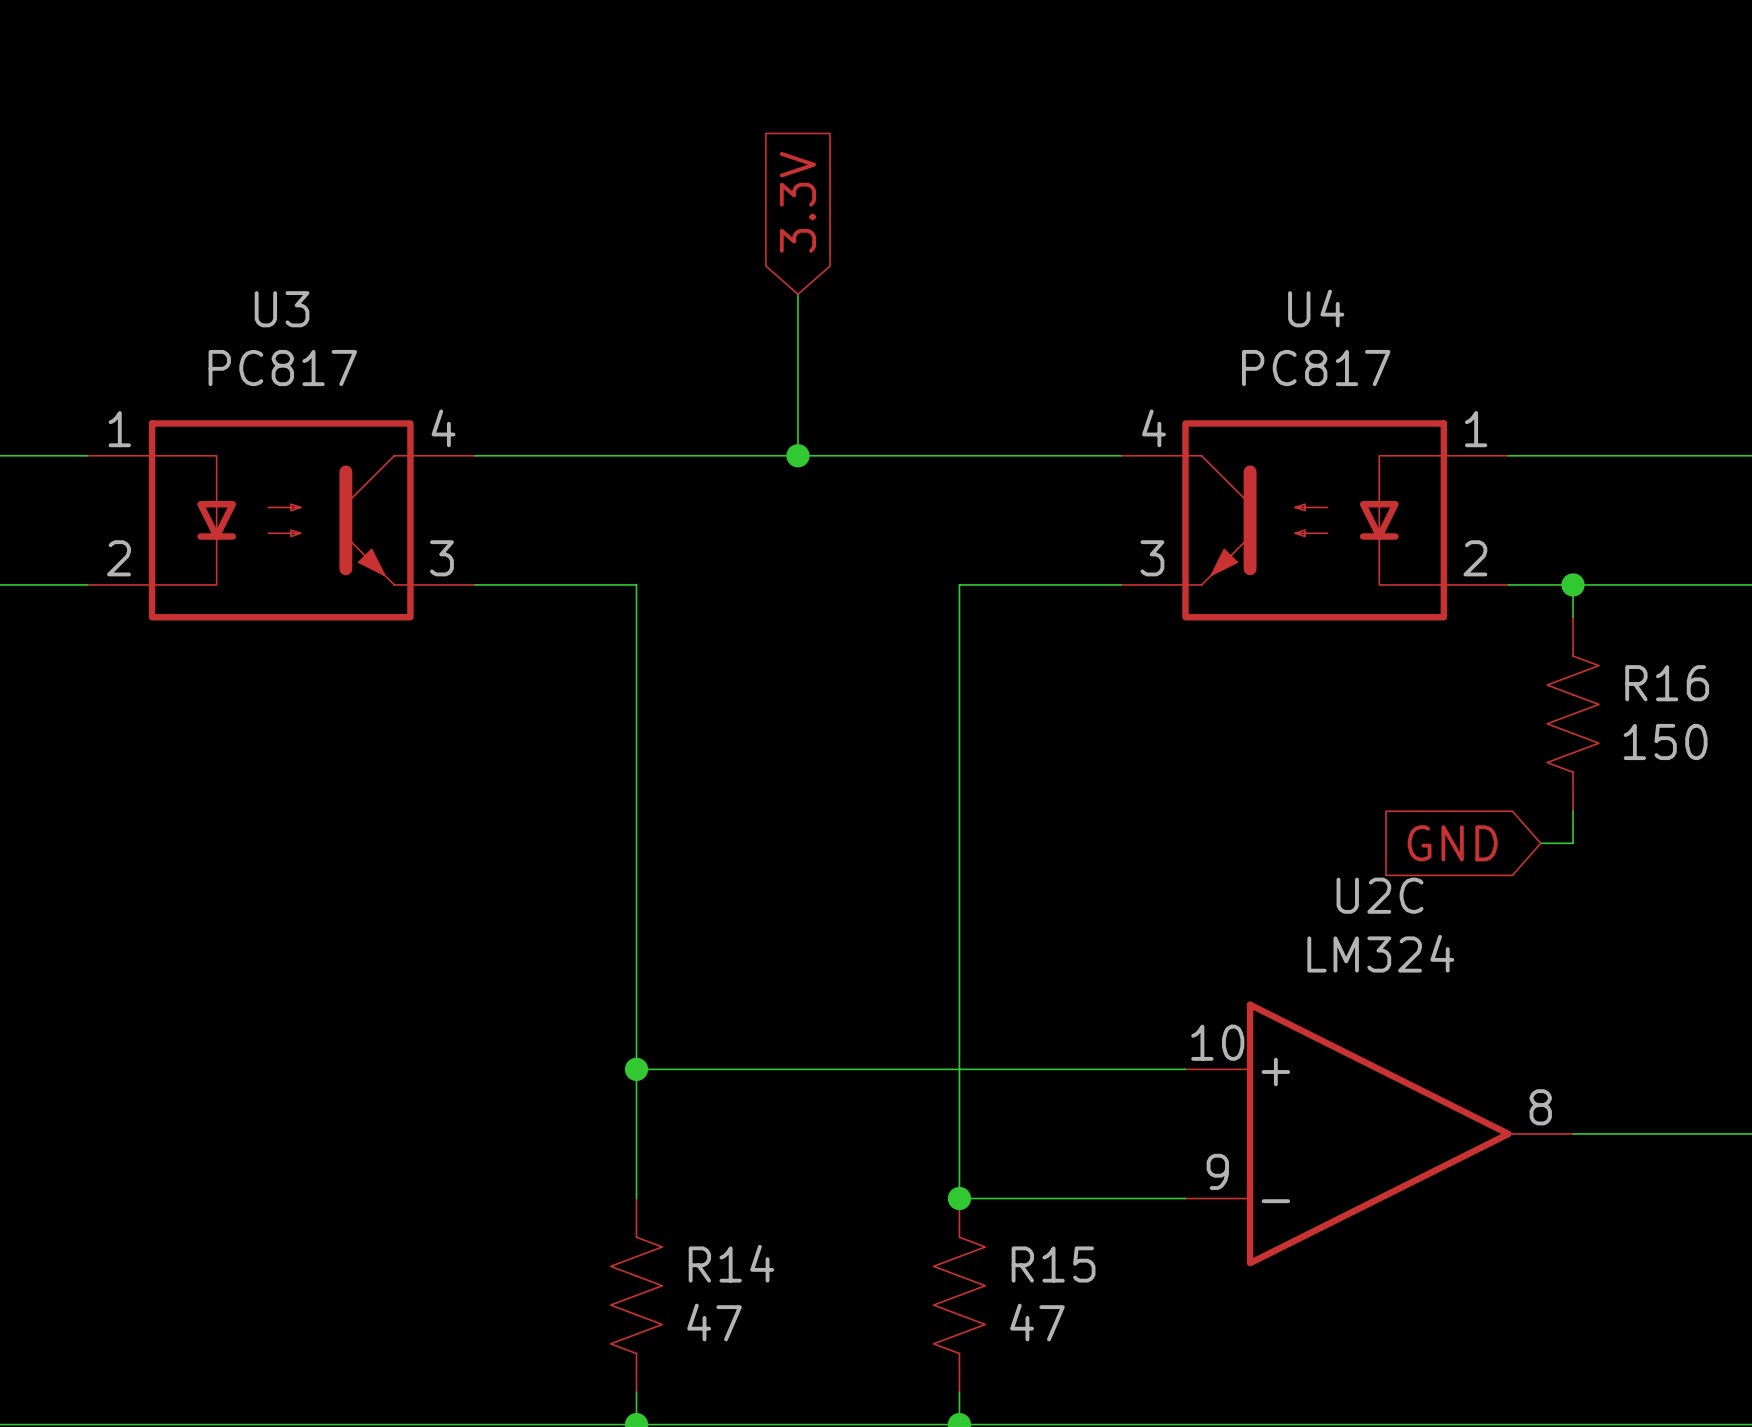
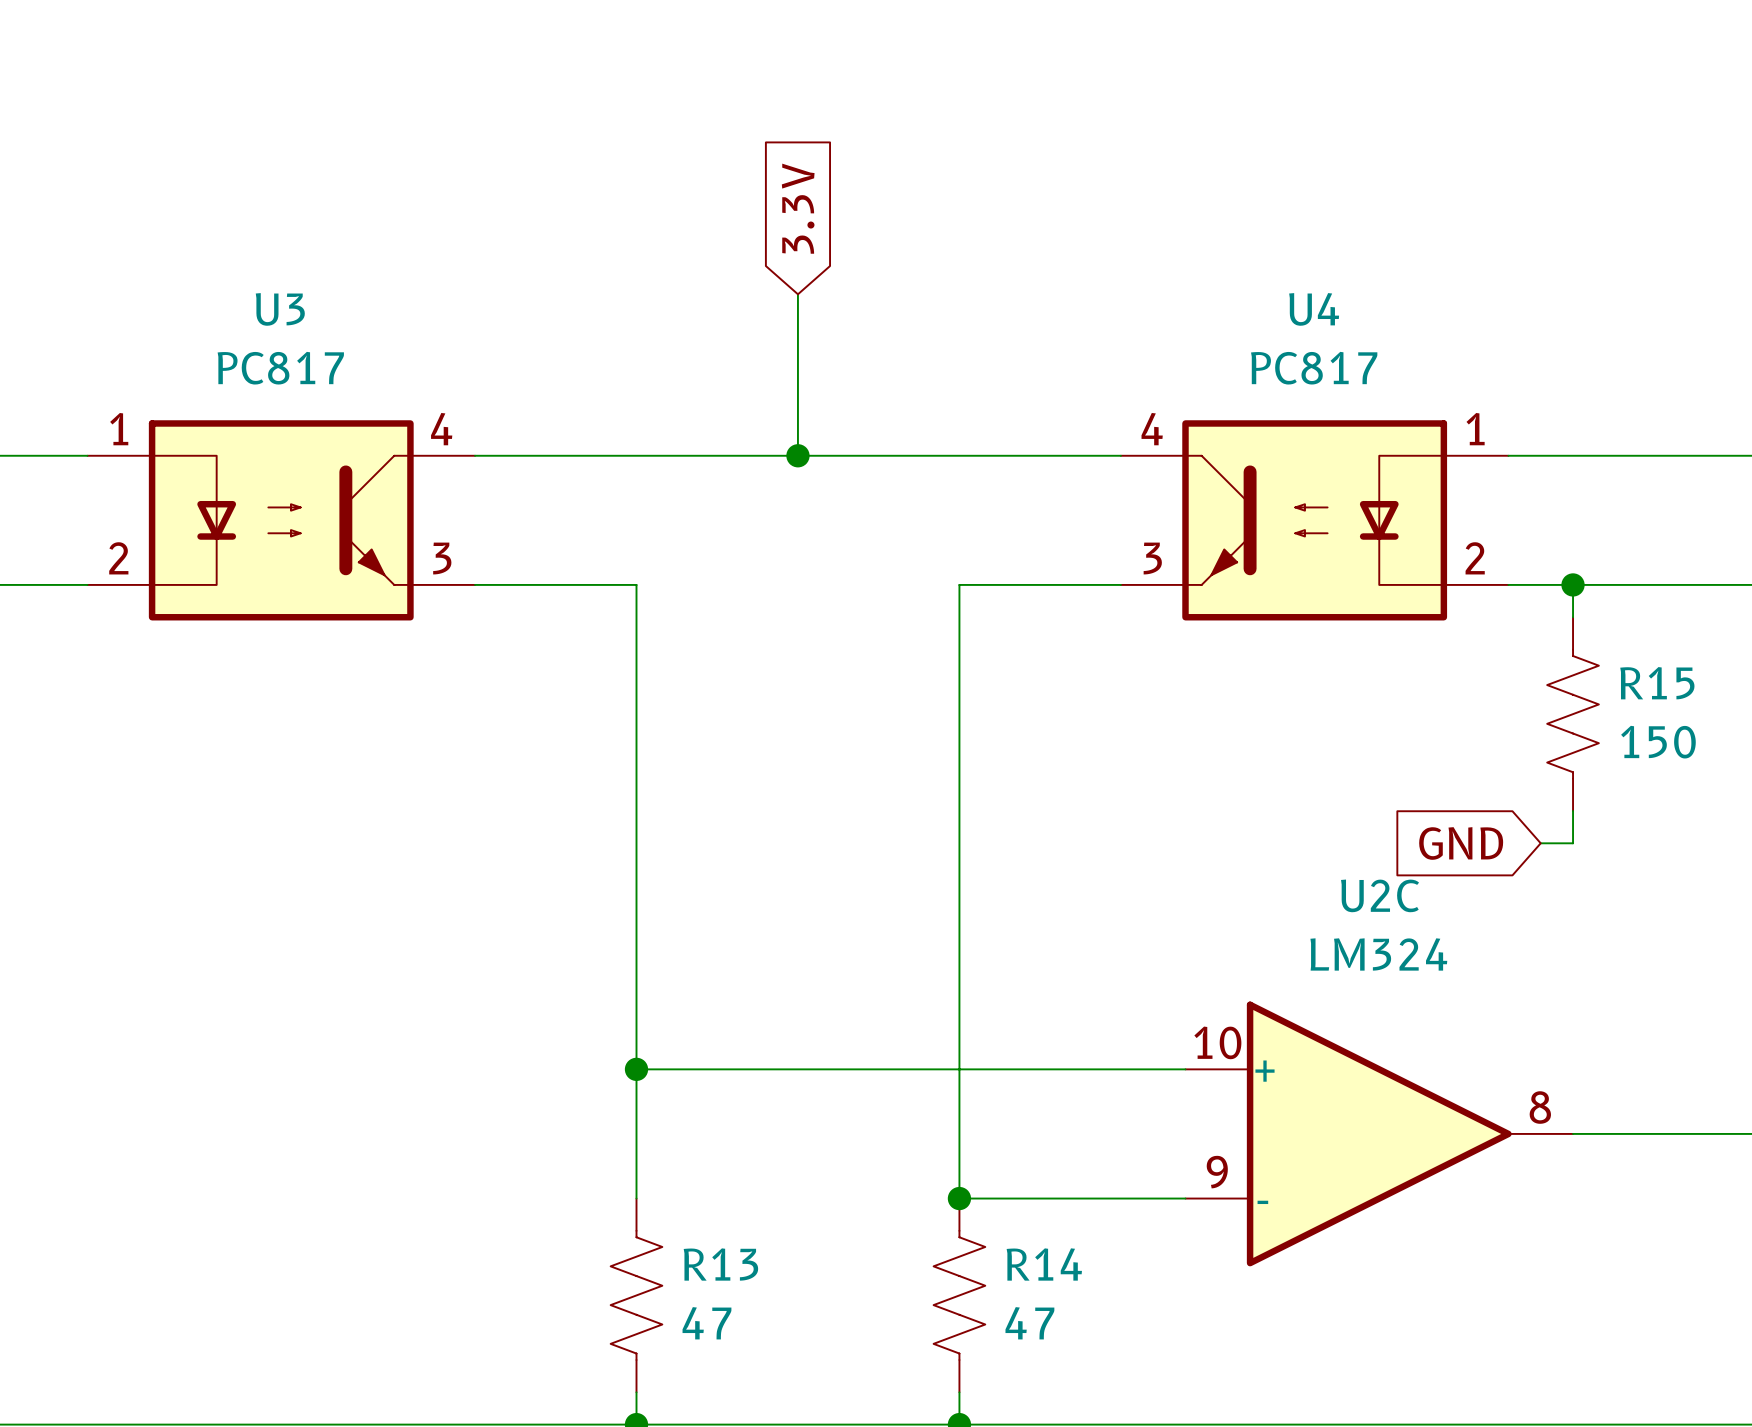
R16 name: R16 (1667, 683) -> R15 (1657, 683)
R14 name: R14 (731, 1263) -> R13 (720, 1264)
R15 name: R15 (1053, 1264) -> R14 (1044, 1264)

